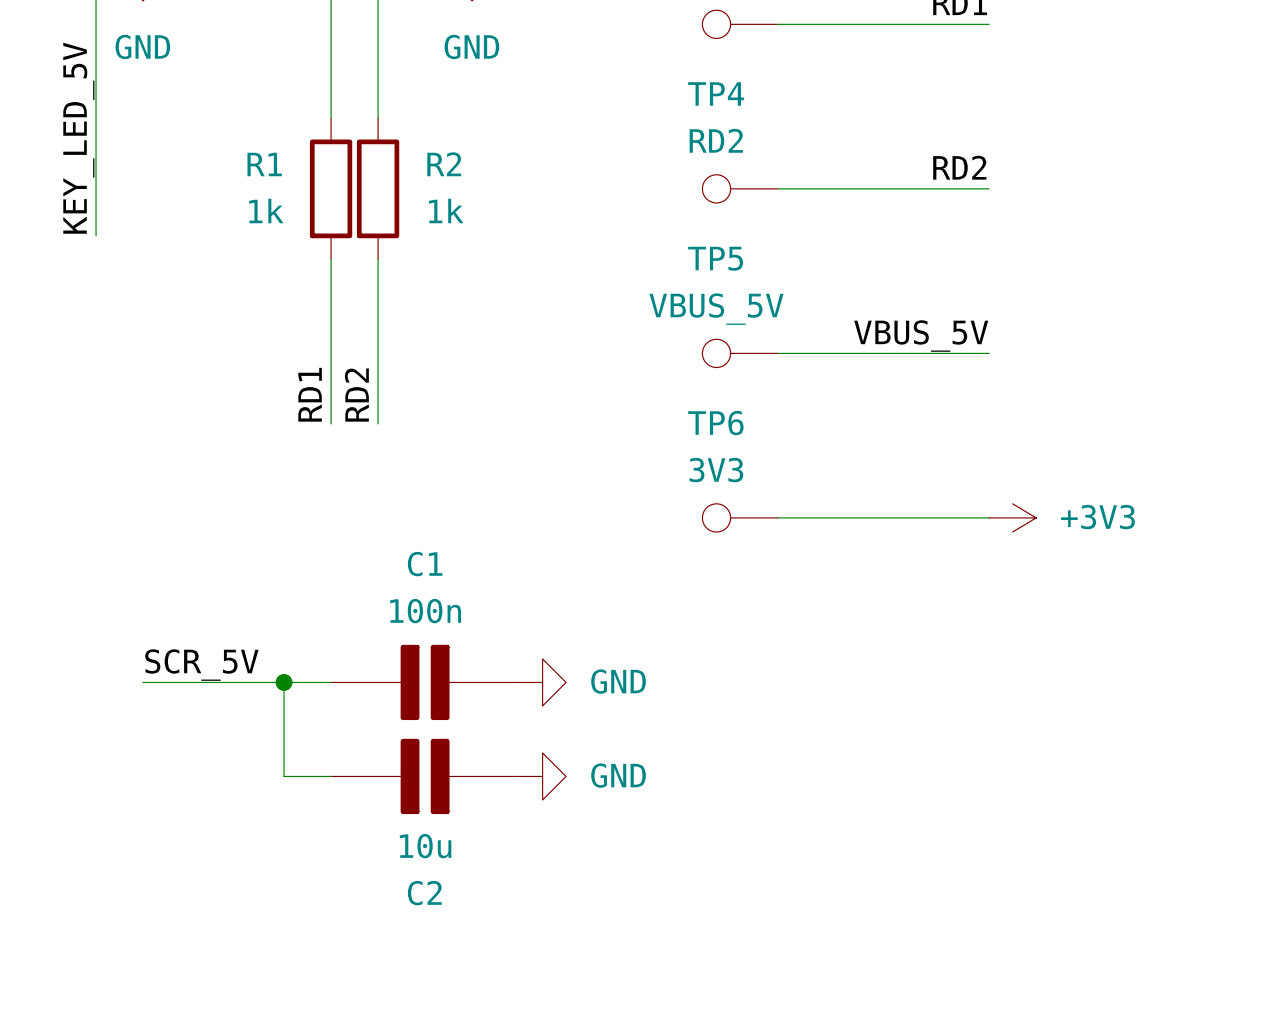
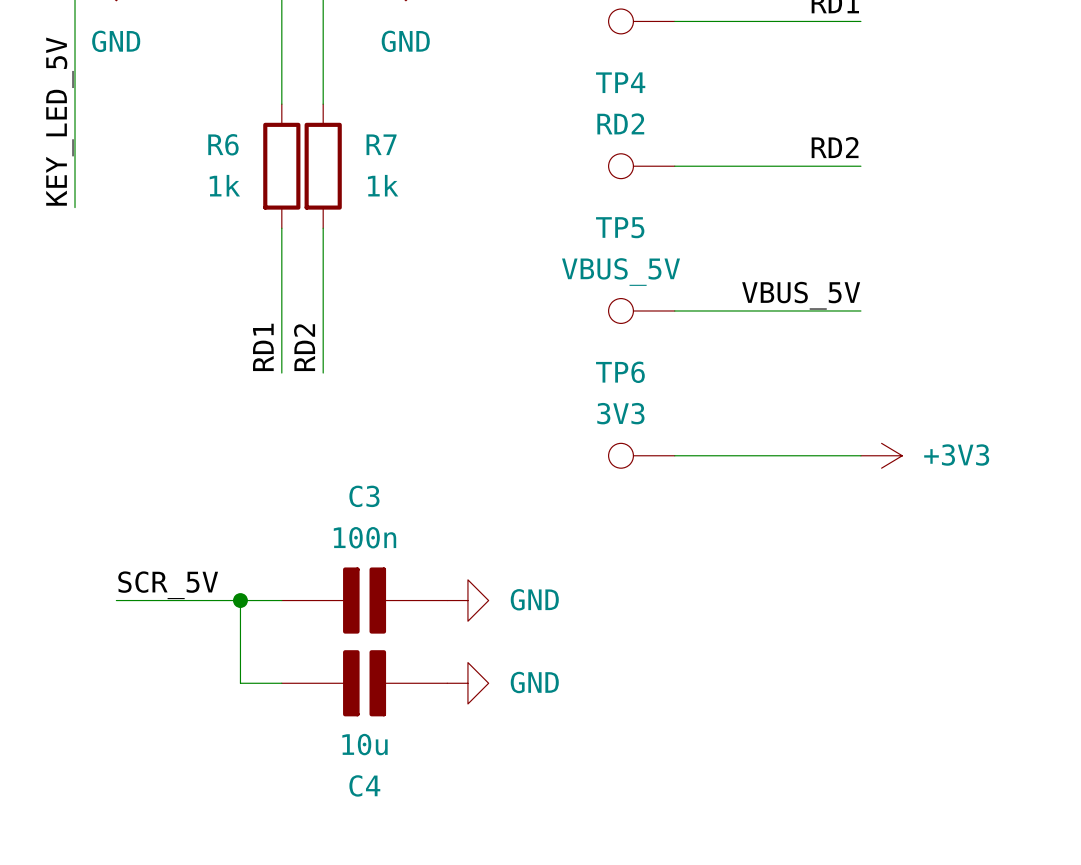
R1 name: R1 (264, 164) -> R6 (223, 144)
R2 name: R2 (444, 164) -> R7 (381, 144)
C1 name: C1 (425, 564) -> C3 (364, 496)
C2 name: C2 (424, 893) -> C4 (364, 785)

